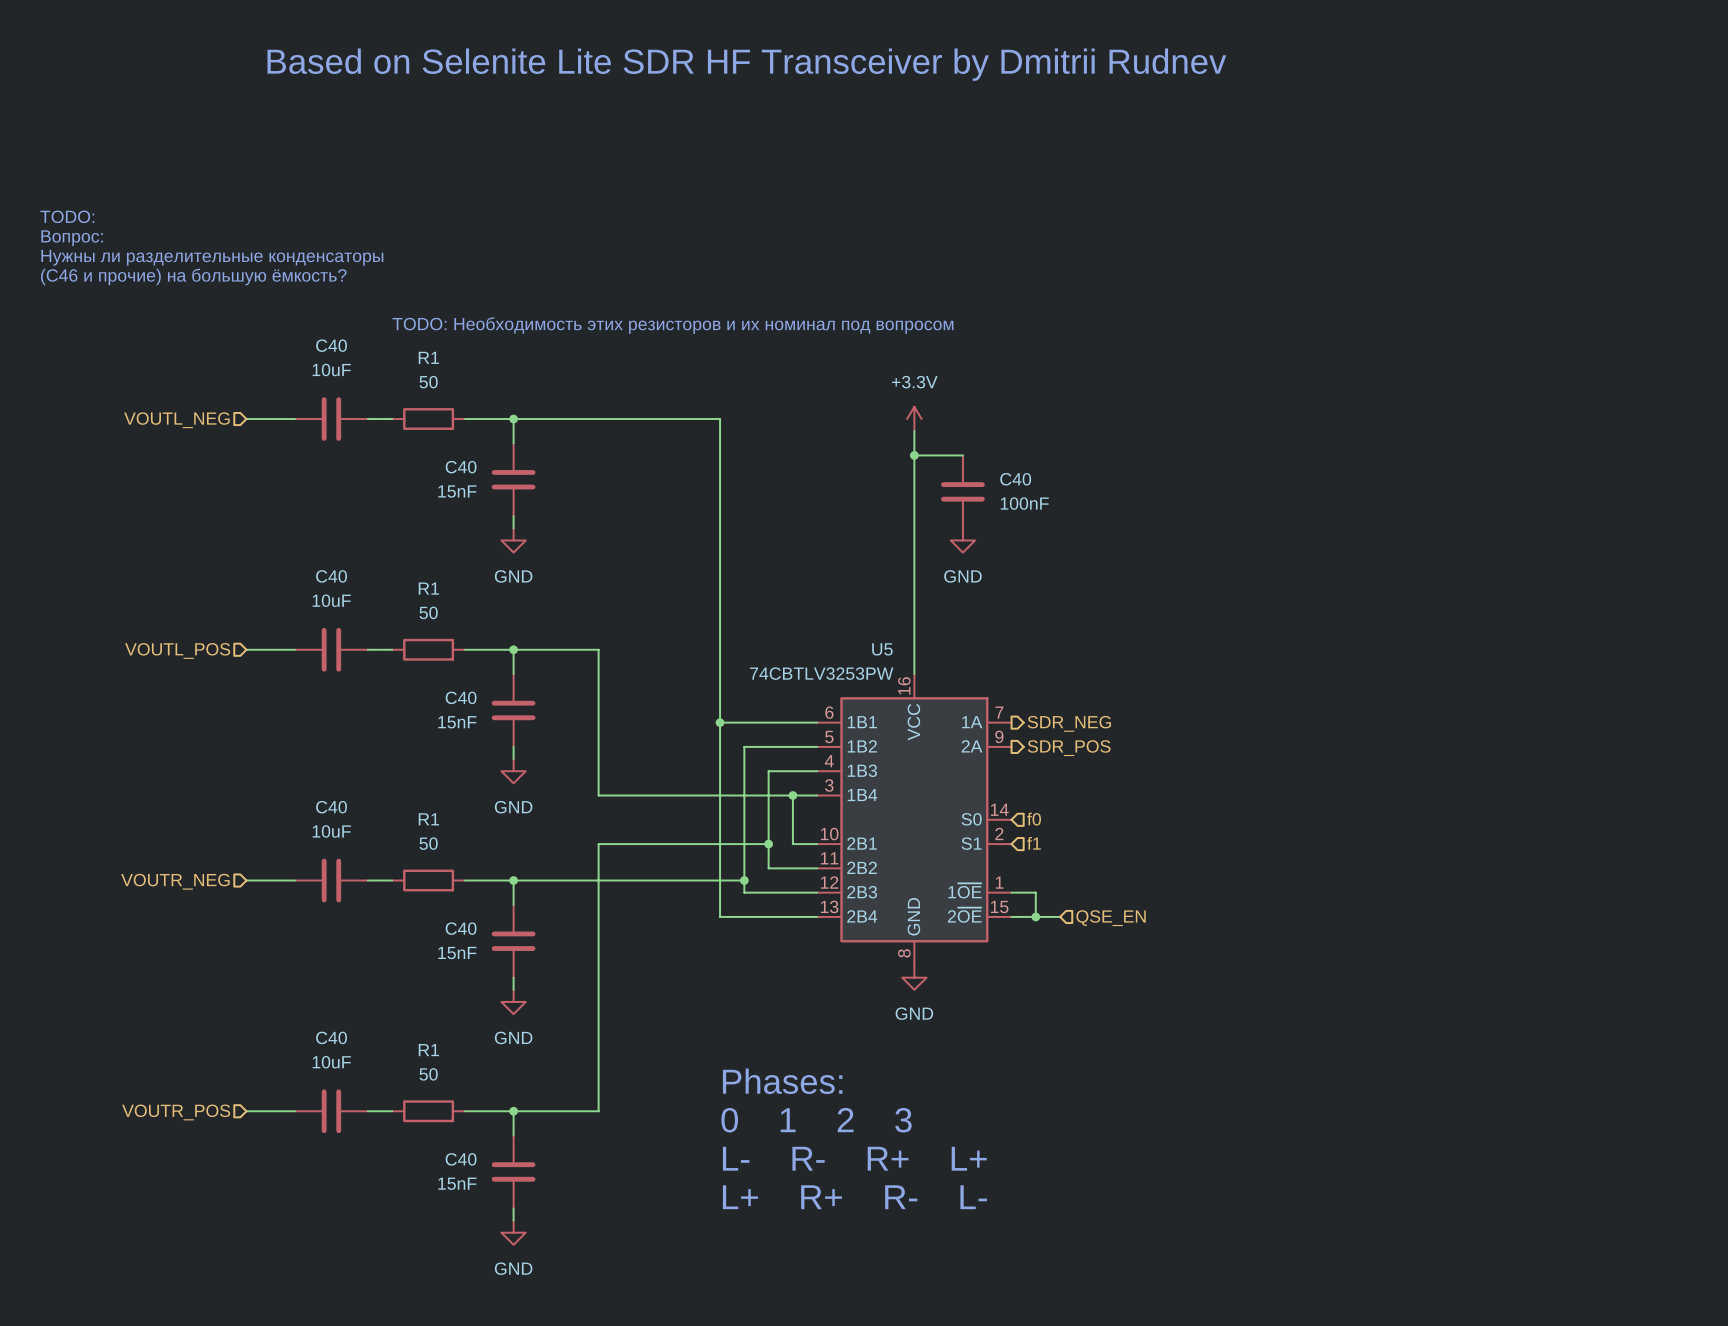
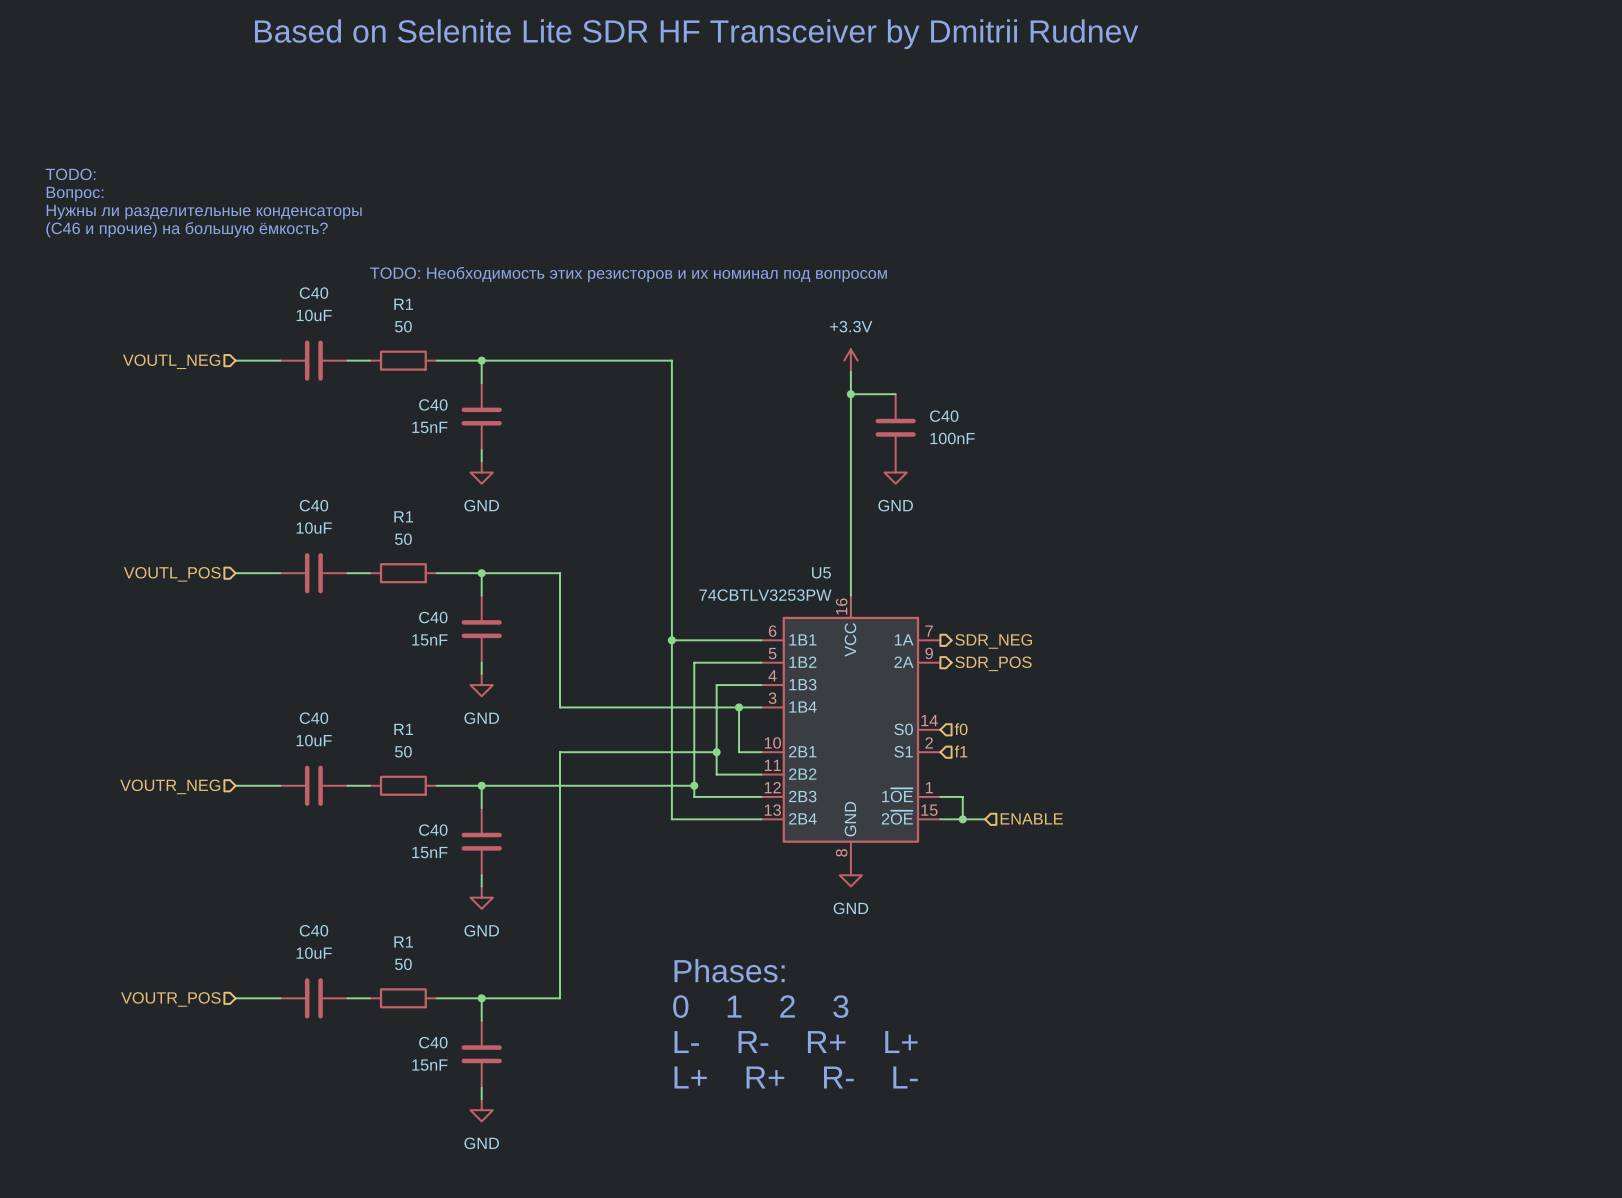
hierarchical label: QSE_EN (1111, 918) -> ENABLE (1031, 818)

